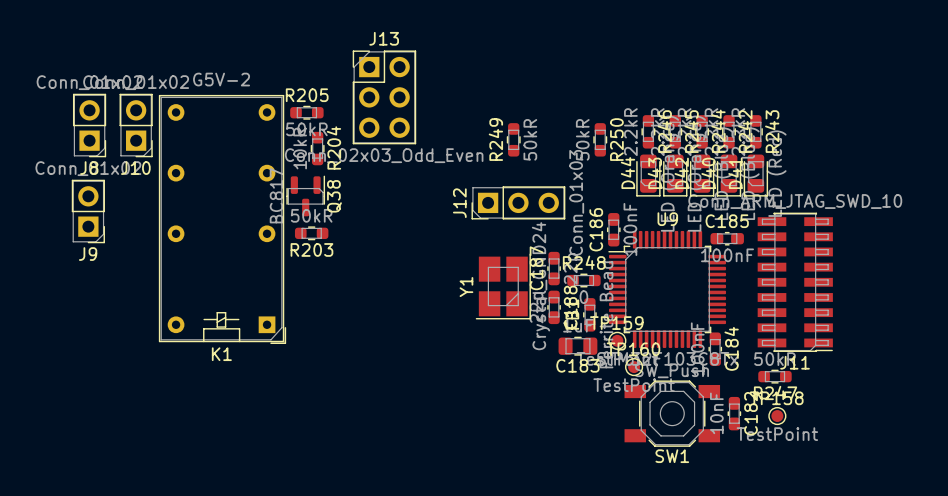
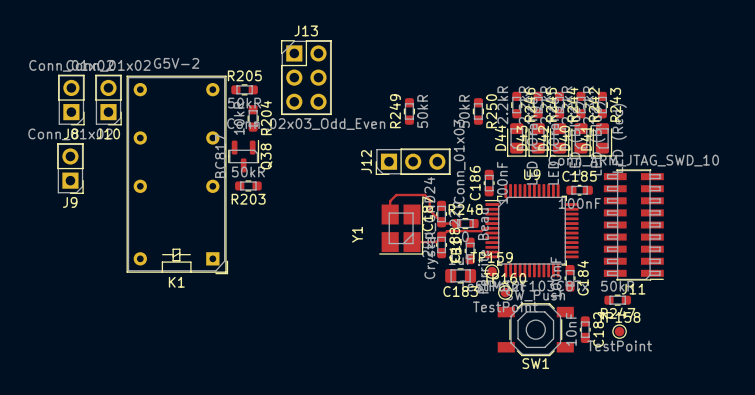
top track: none -> (390, 214) (390, 201) (396, 195) (424, 195) (429, 199) (429, 210) (442, 223) (456, 223)
top track: none -> (492, 228) (484, 228) (481, 231) (447, 231) (436, 242) (412, 242)
Y1 name position: Y1 (466, 287) -> Y1 (357, 234)

